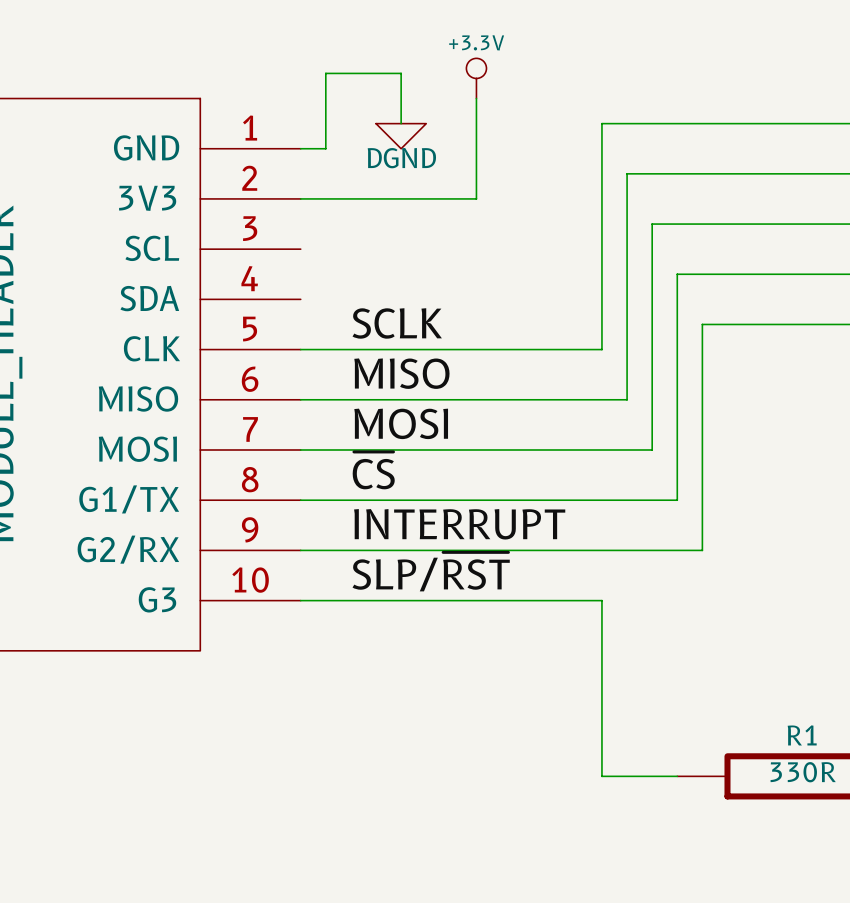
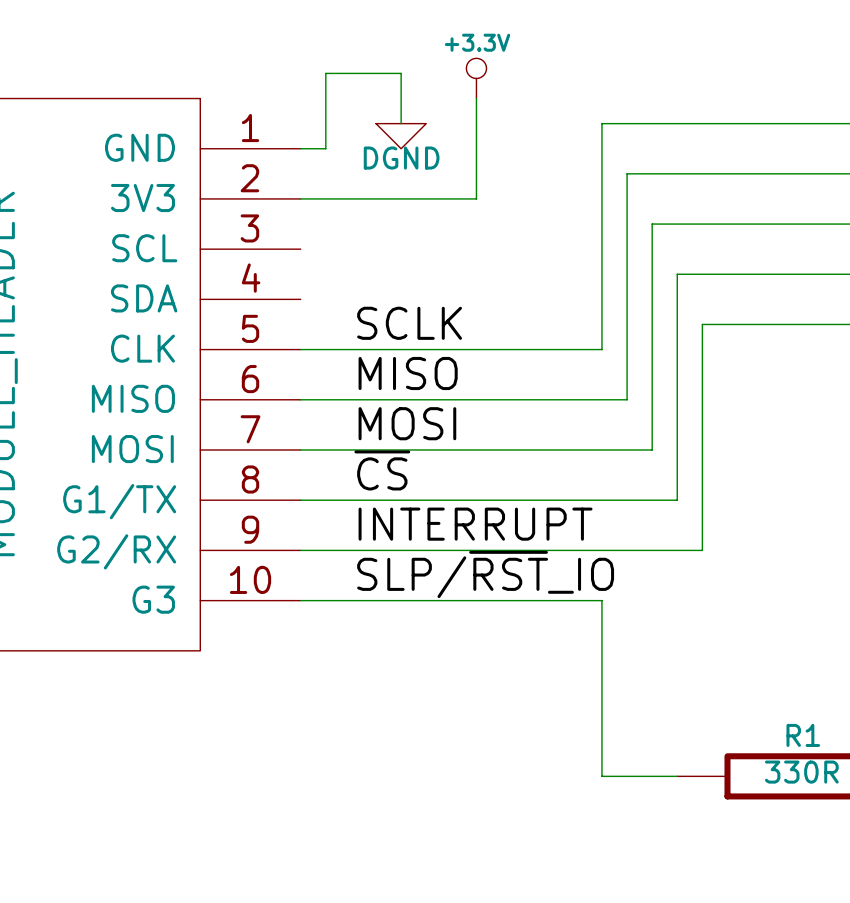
label: SLP/~{RST} (431, 571) -> SLP/~{RST}_IO (485, 574)

